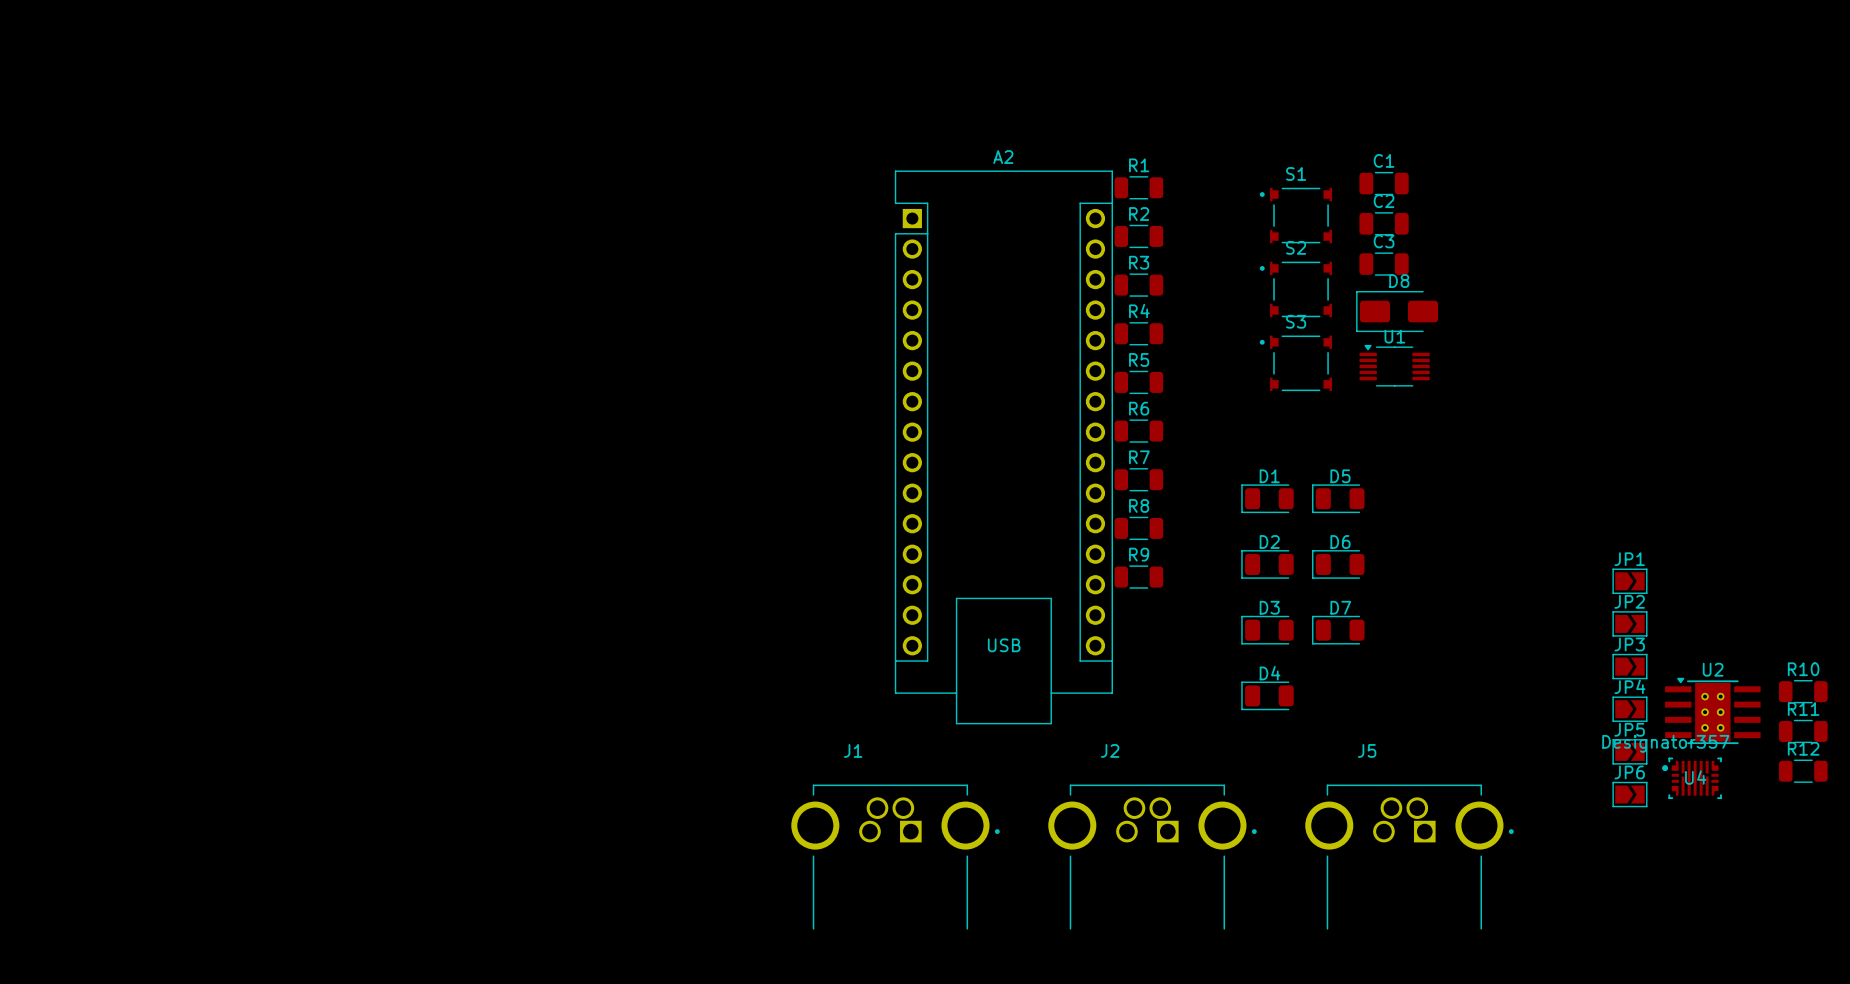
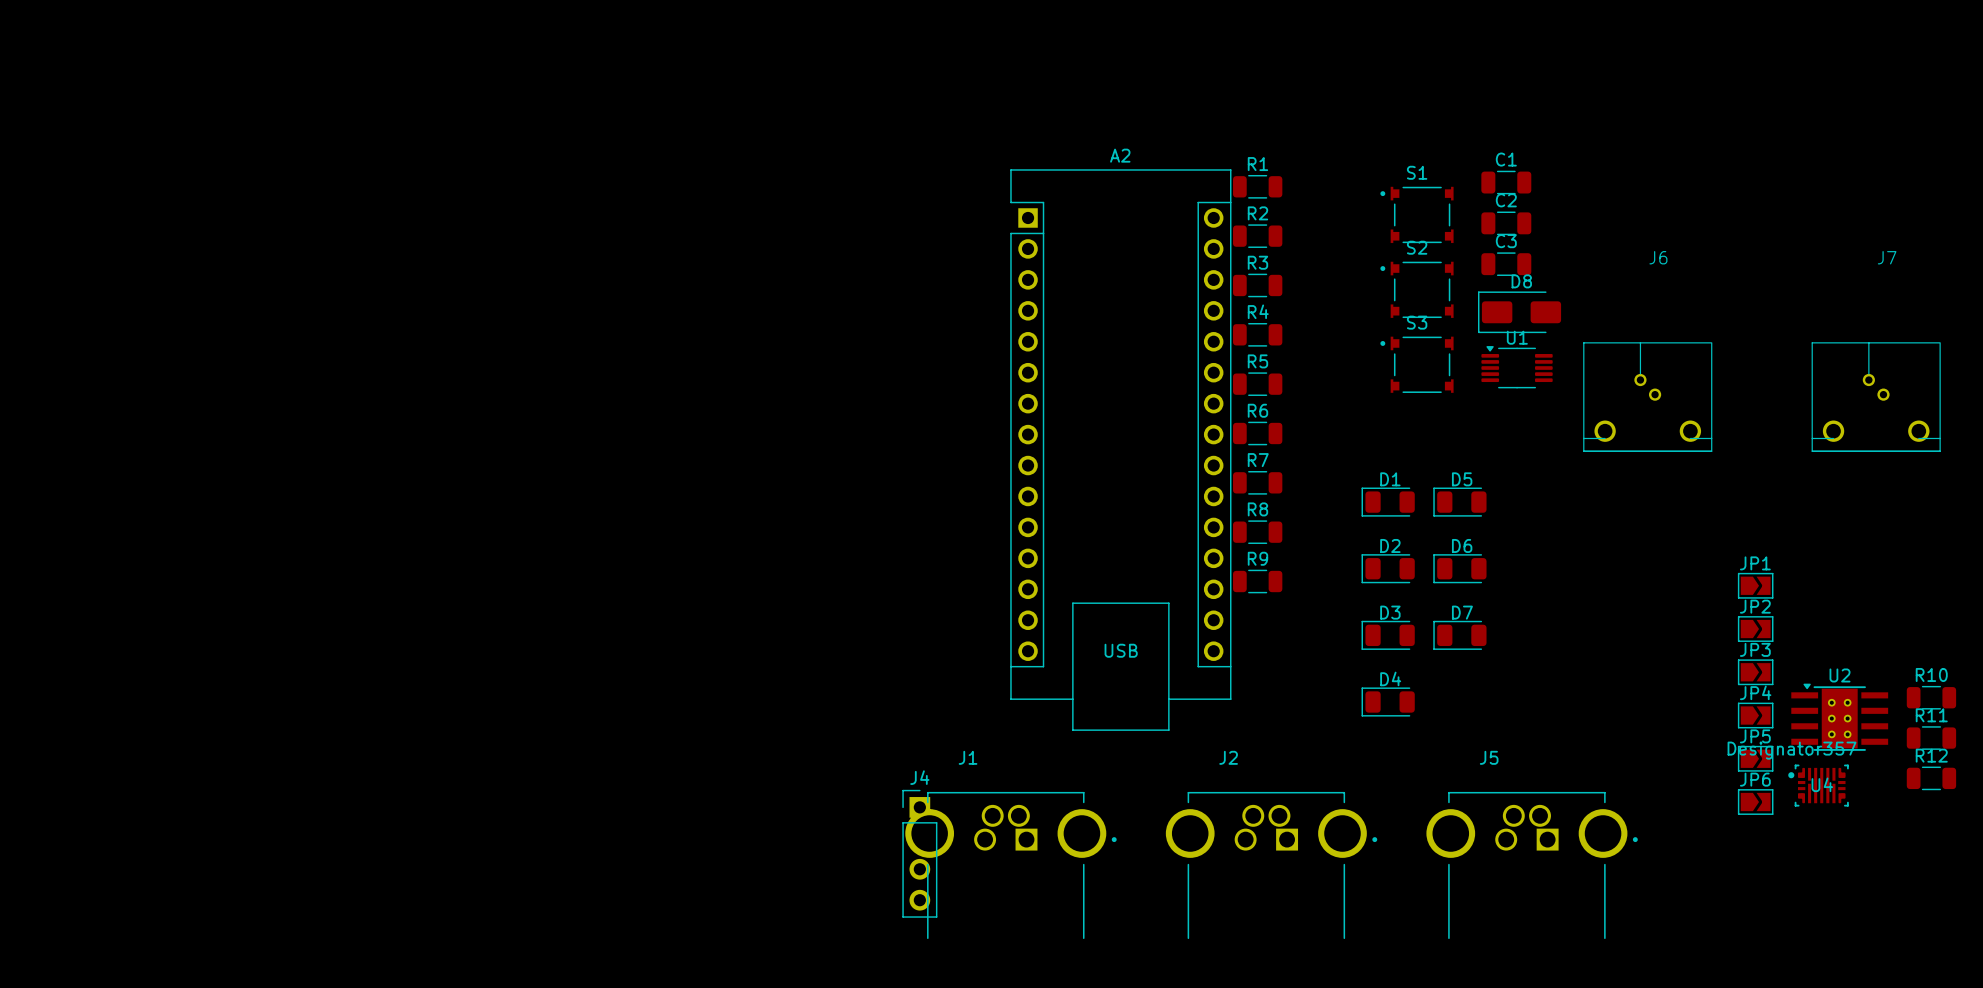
J6: none -> (1647, 397)
J7: none -> (1876, 397)
J4: none -> (919, 853)

